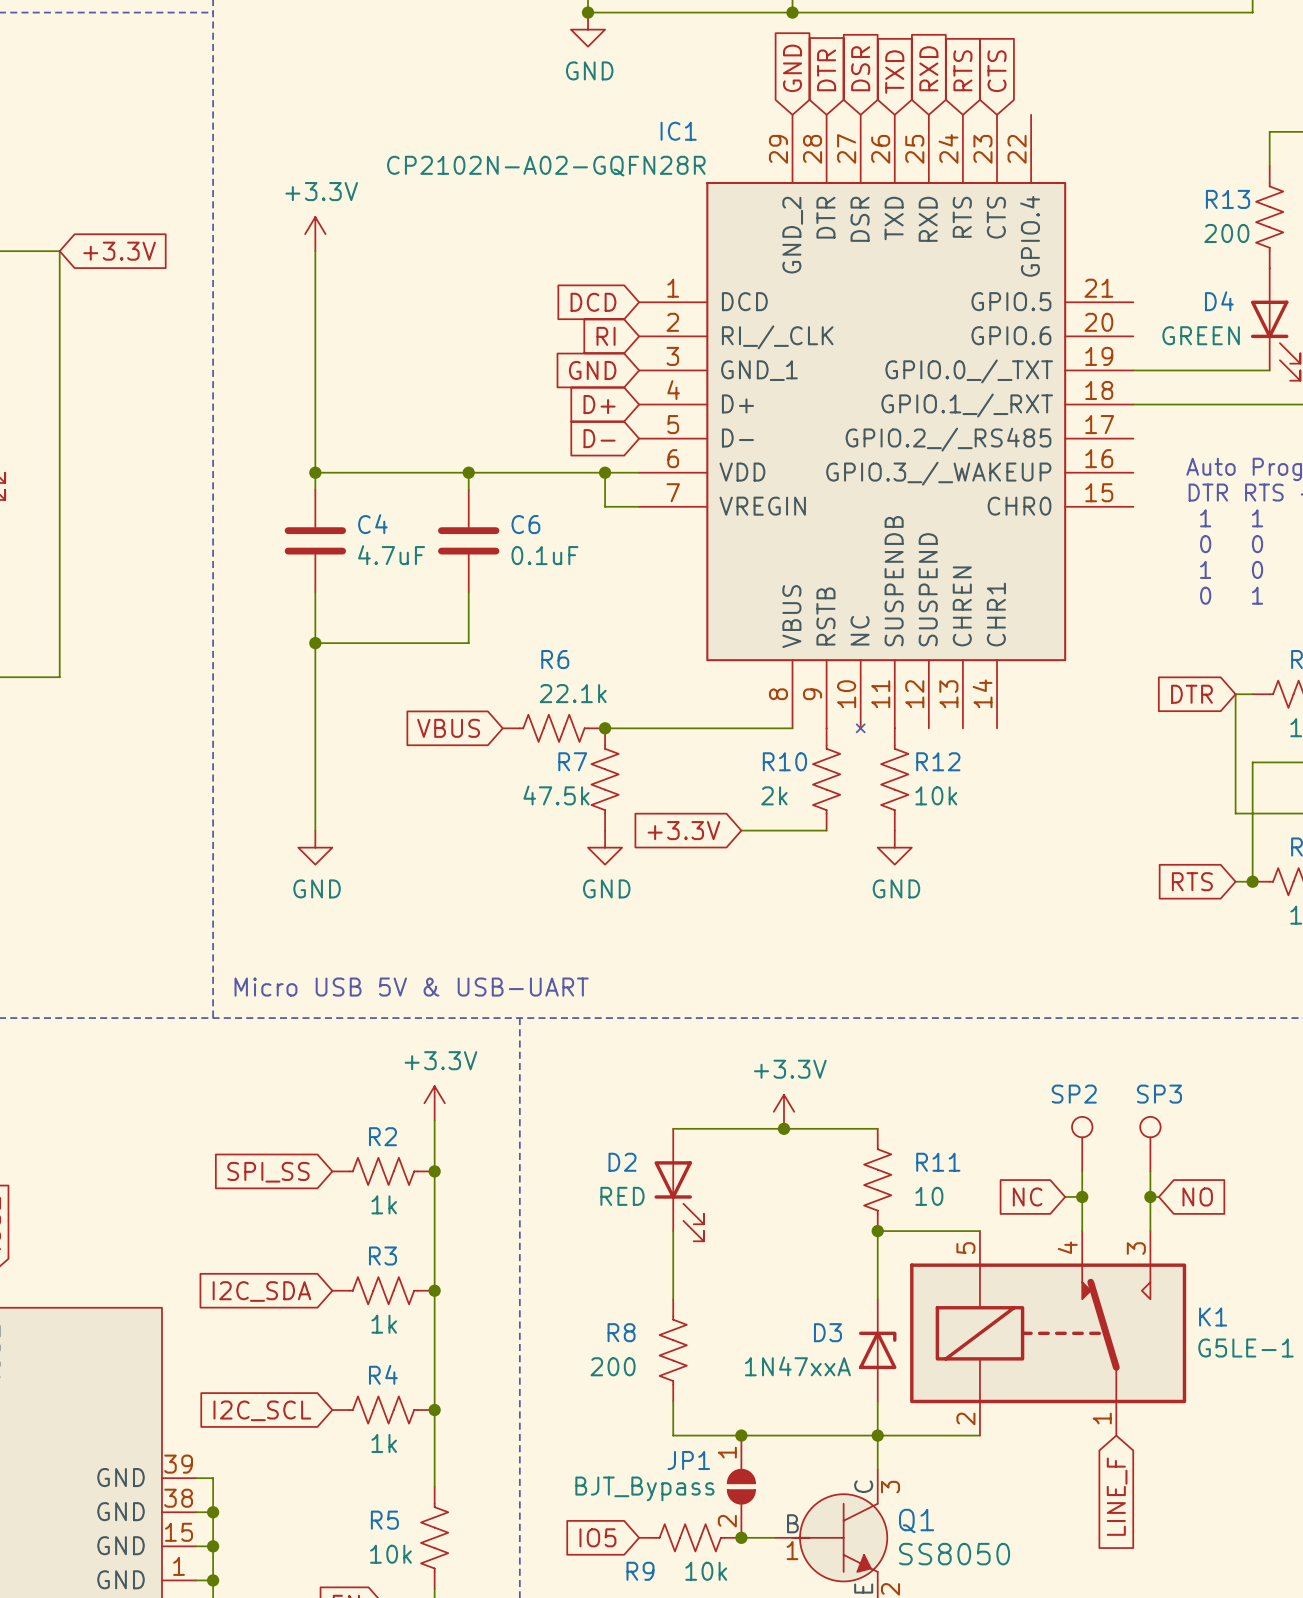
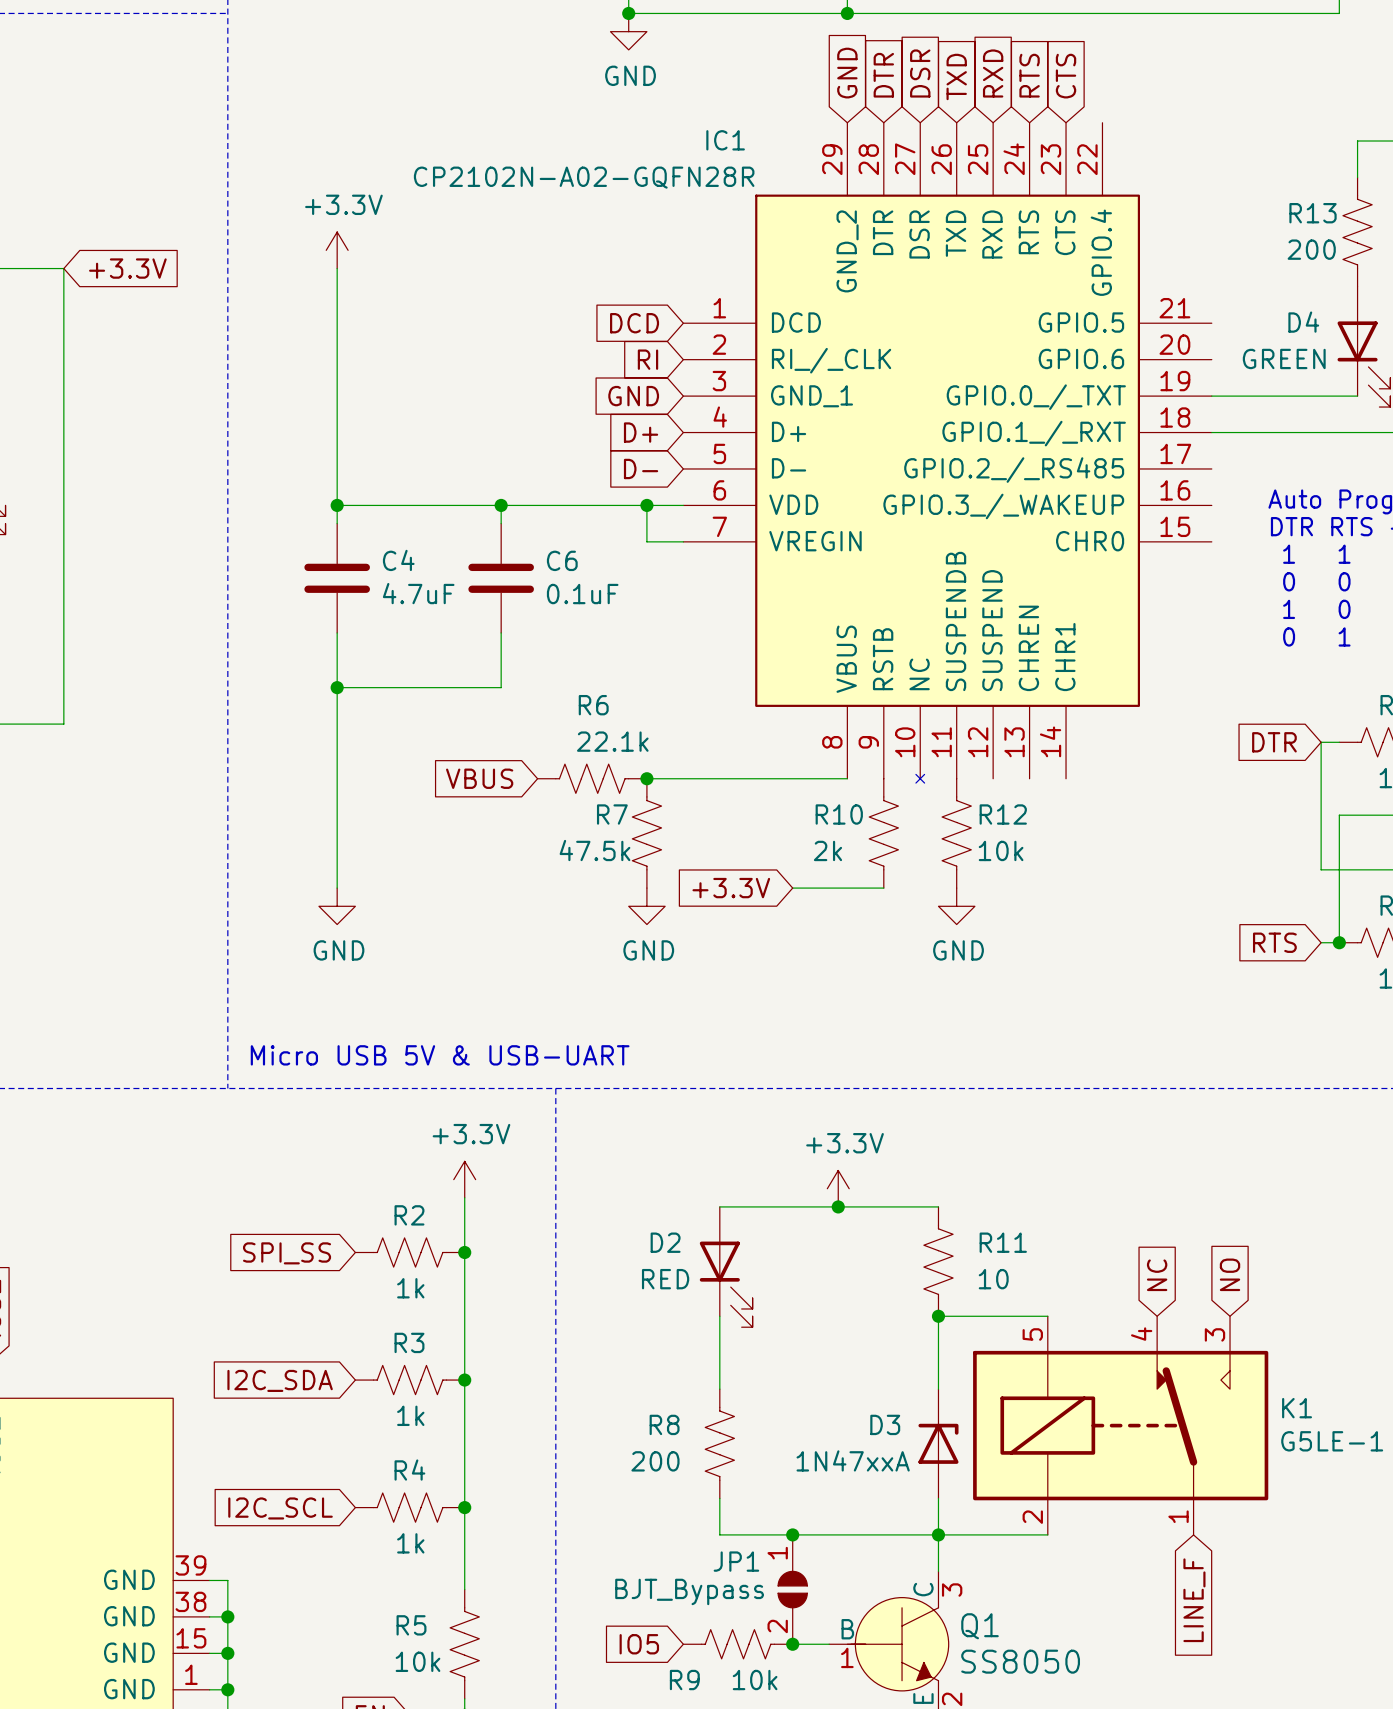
SP2: (1082, 1144) -> none
SP3: (1150, 1144) -> none
wire: (1082, 1171) (1082, 1231) -> none
wire: (1150, 1171) (1150, 1231) -> none
global label rotation: 0° (1027, 1196) -> 90° clockwise (1157, 1275)
junction: (1082, 1196) -> none
junction: (1150, 1196) -> none
global label rotation: 0° (1197, 1196) -> 90° counterclockwise (1230, 1274)

